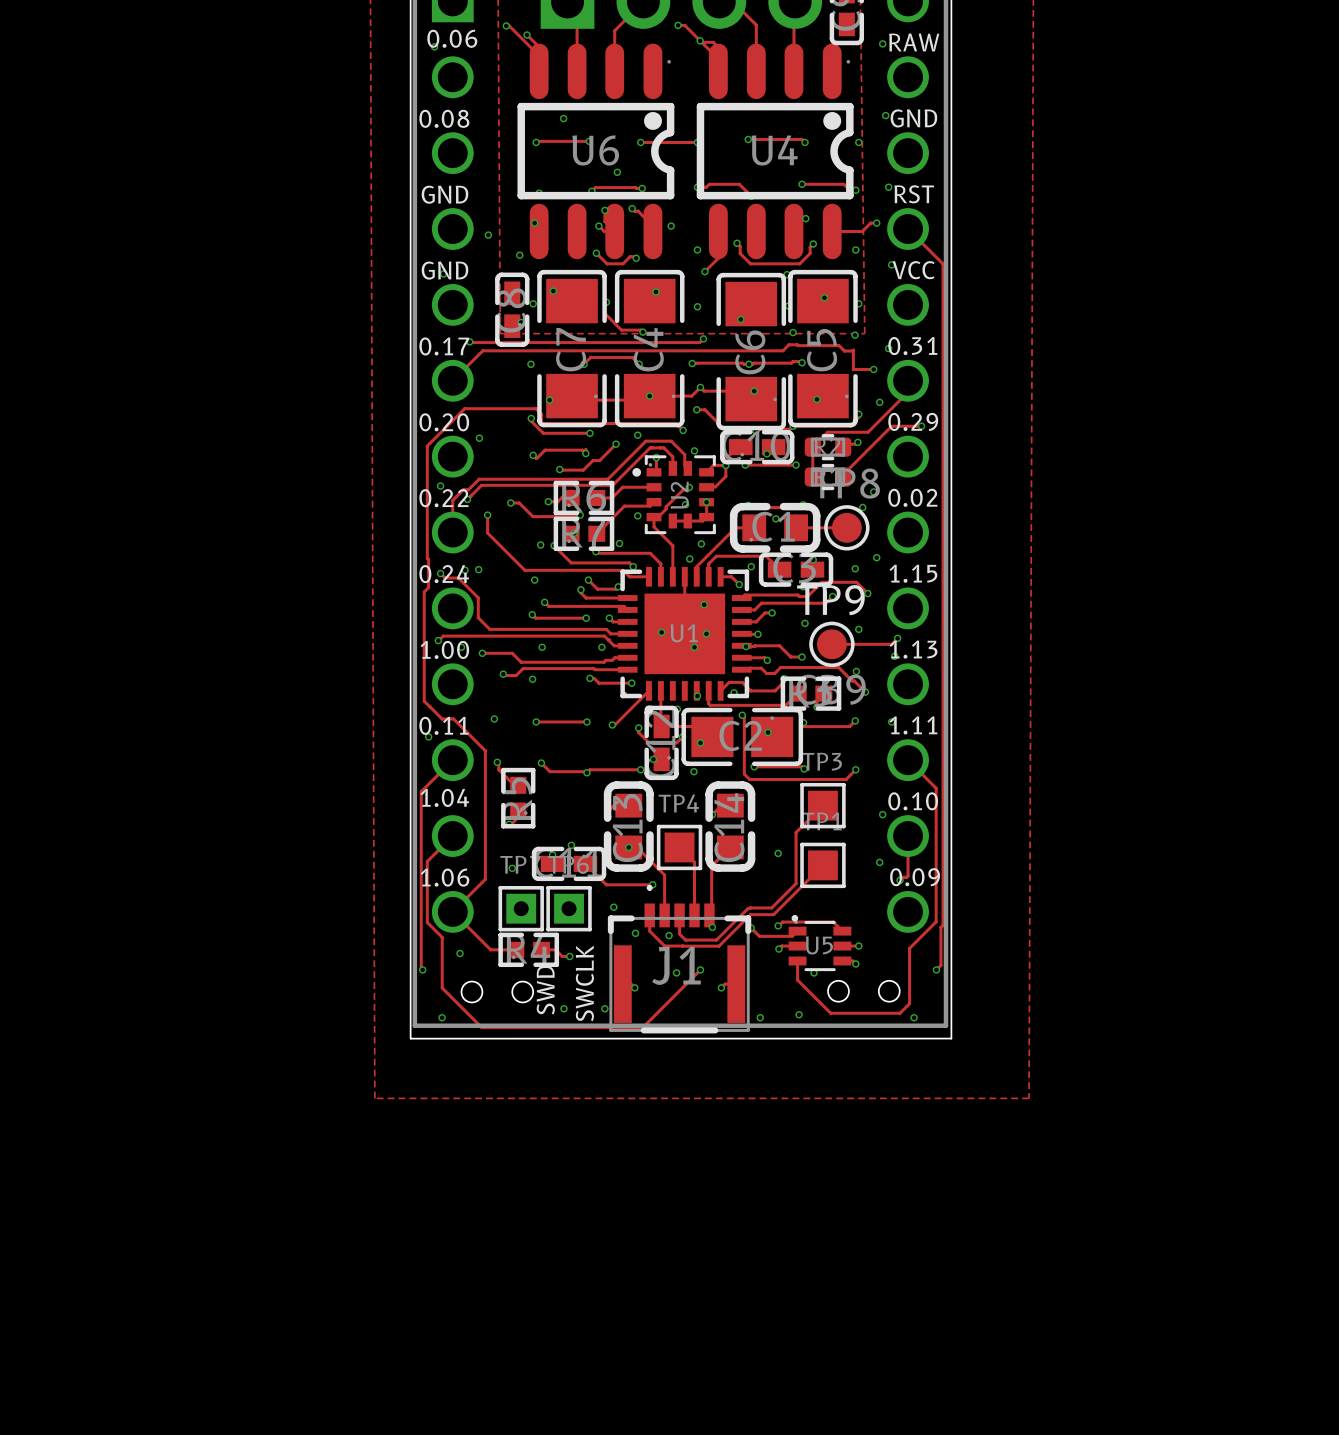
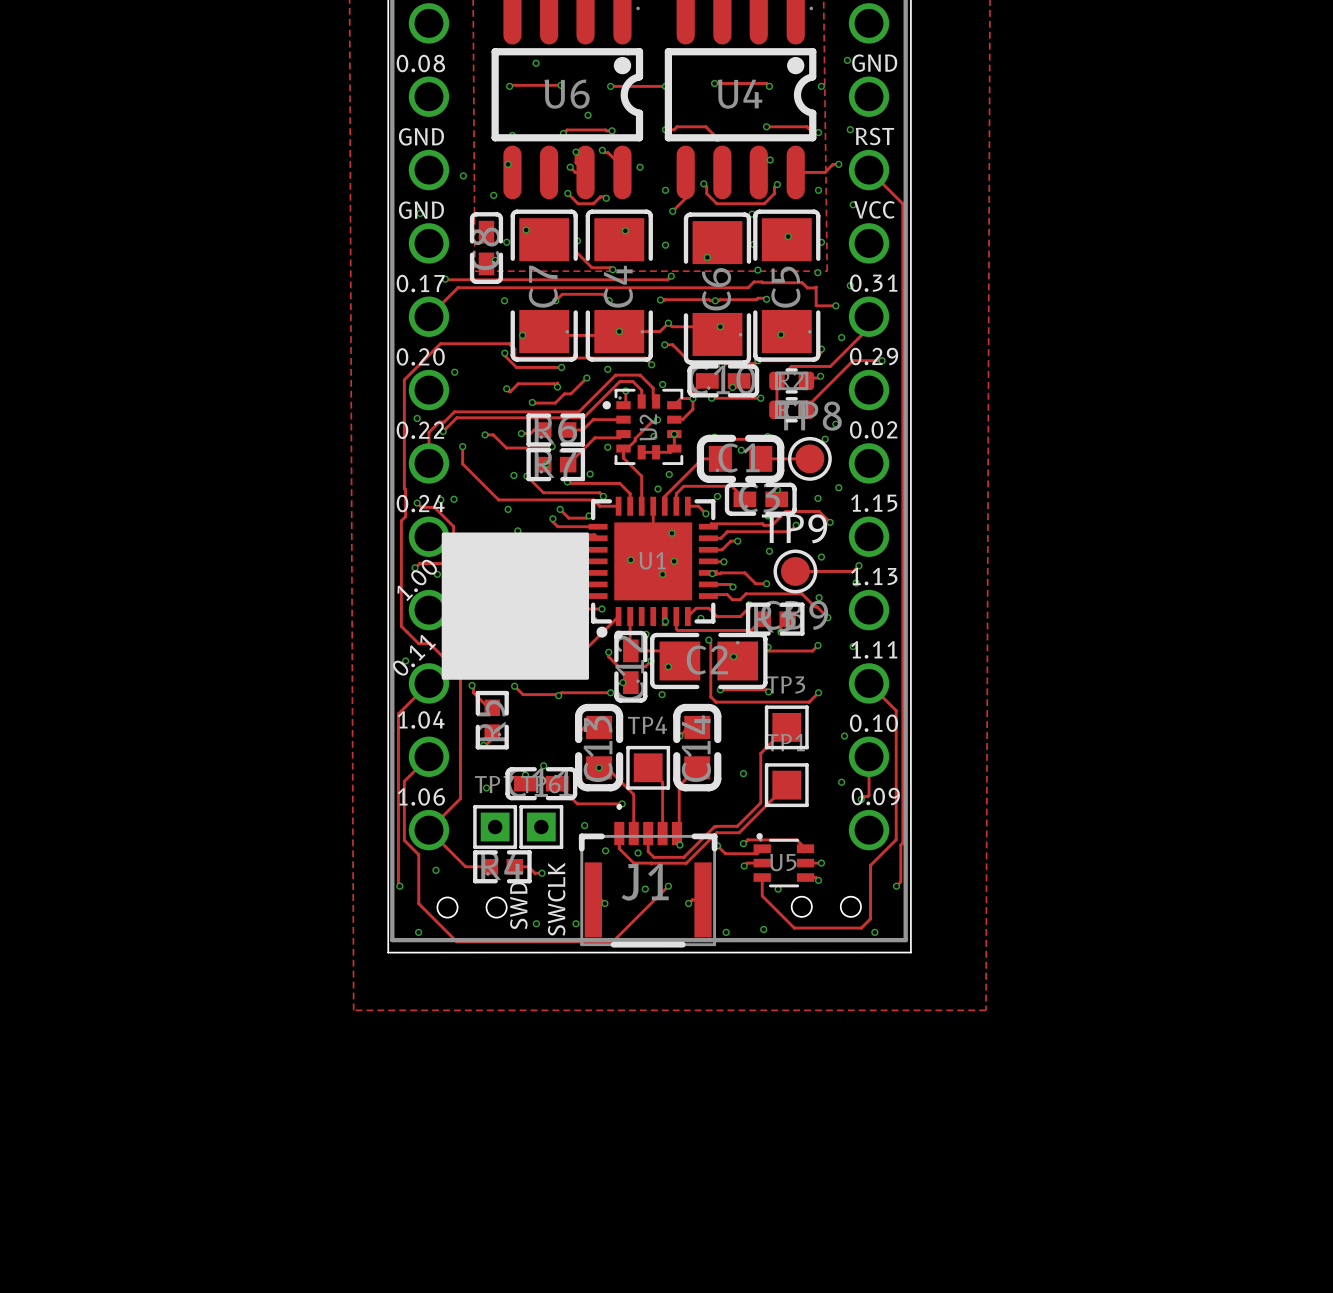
drawing: none -> [441, 532, 608, 680]
part text rotation: 0° (444, 649) -> 45° counterclockwise (417, 580)
part text rotation: 0° (443, 725) -> 45° counterclockwise (414, 655)

